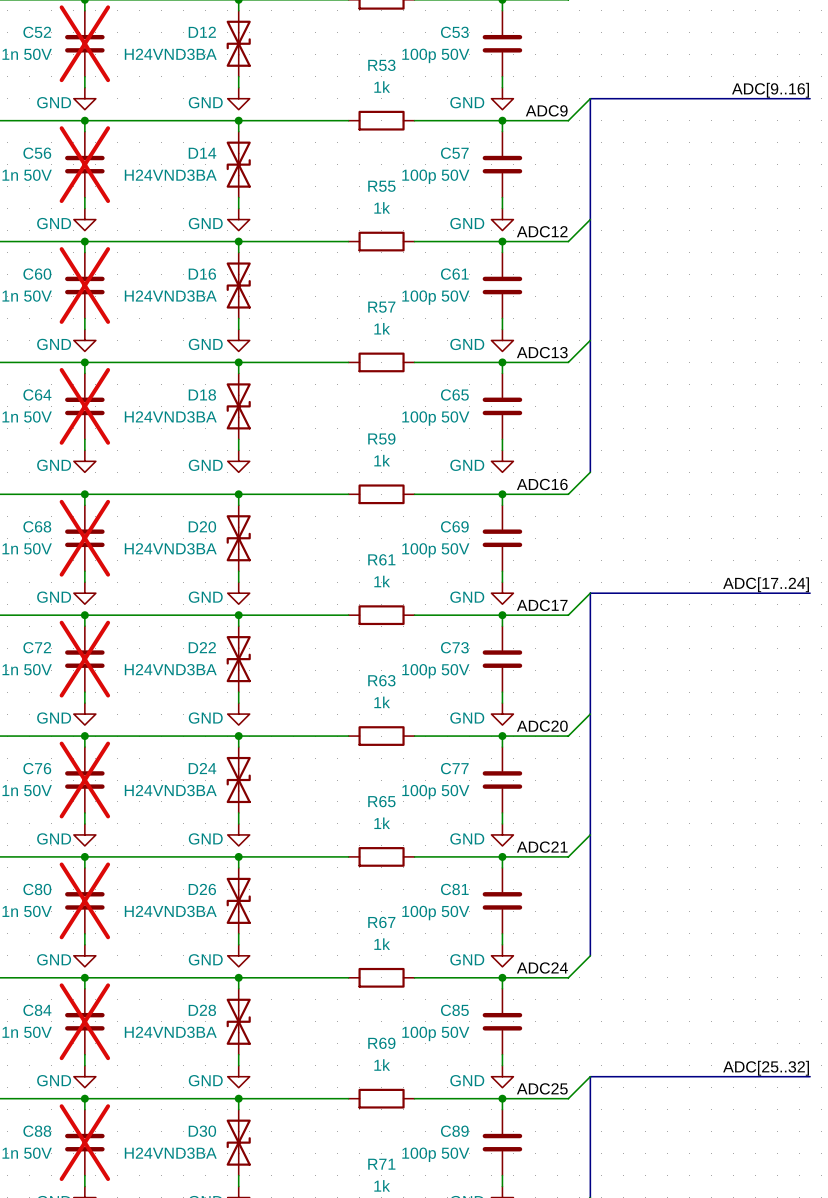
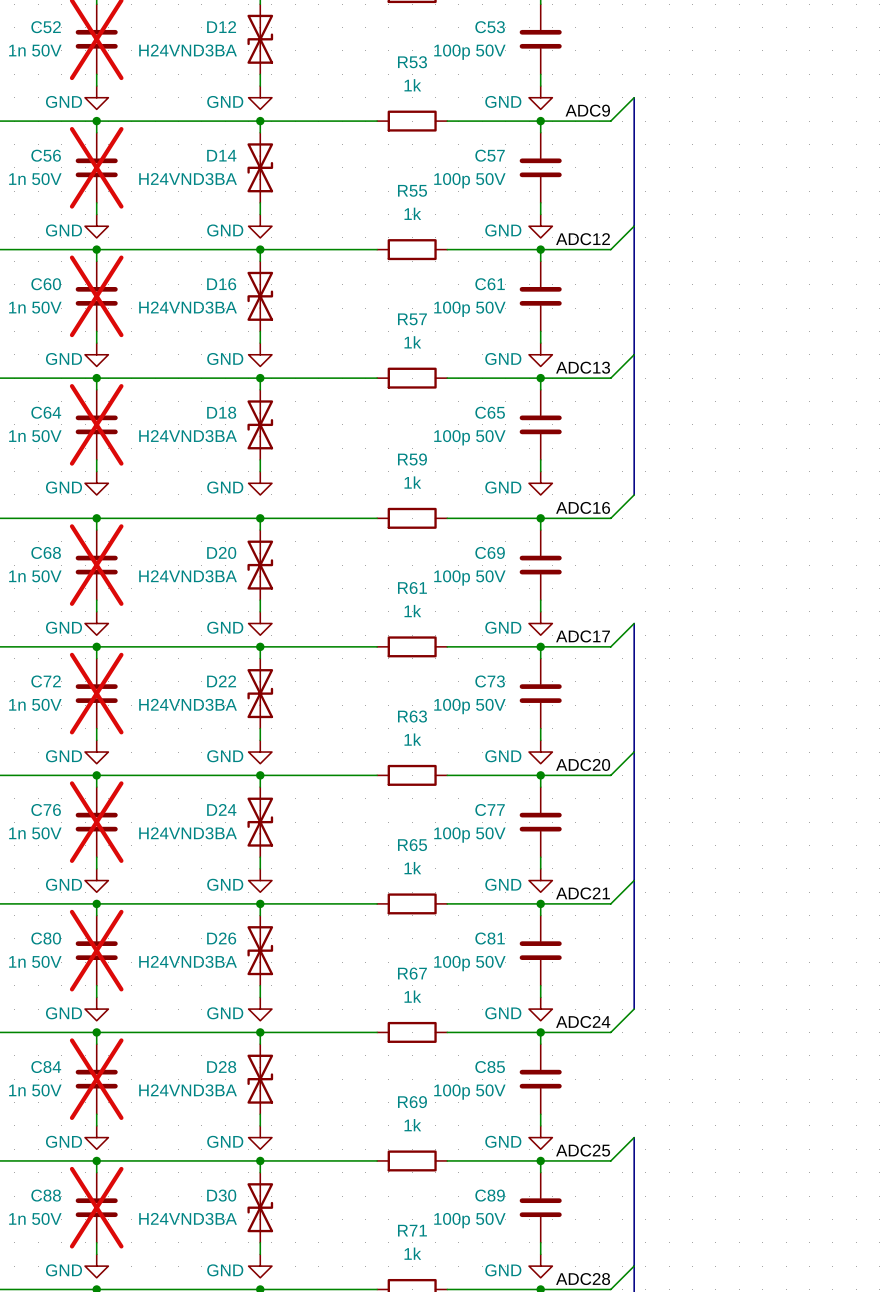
label: ADC[9..16] (770, 90) -> none
bus: (590, 98) (810, 98) -> none
label: ADC[17..24] (766, 584) -> none
bus: (590, 593) (810, 593) -> none
label: ADC[25..32] (766, 1068) -> none
bus: (590, 1076) (810, 1076) -> none

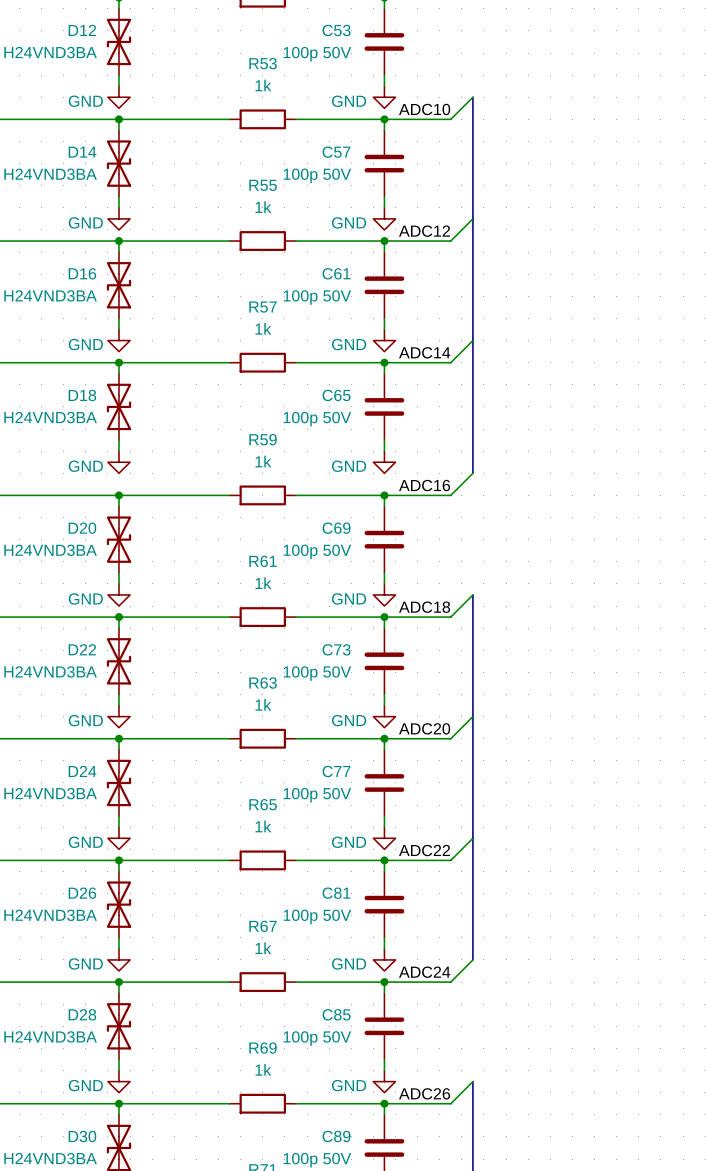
label: ADC9 (587, 110) -> ADC10 (424, 109)
label: ADC13 (583, 367) -> ADC14 (424, 352)
label: ADC17 (583, 636) -> ADC18 (424, 607)
label: ADC21 (583, 893) -> ADC22 (424, 850)
label: ADC25 (583, 1150) -> ADC26 (424, 1093)

